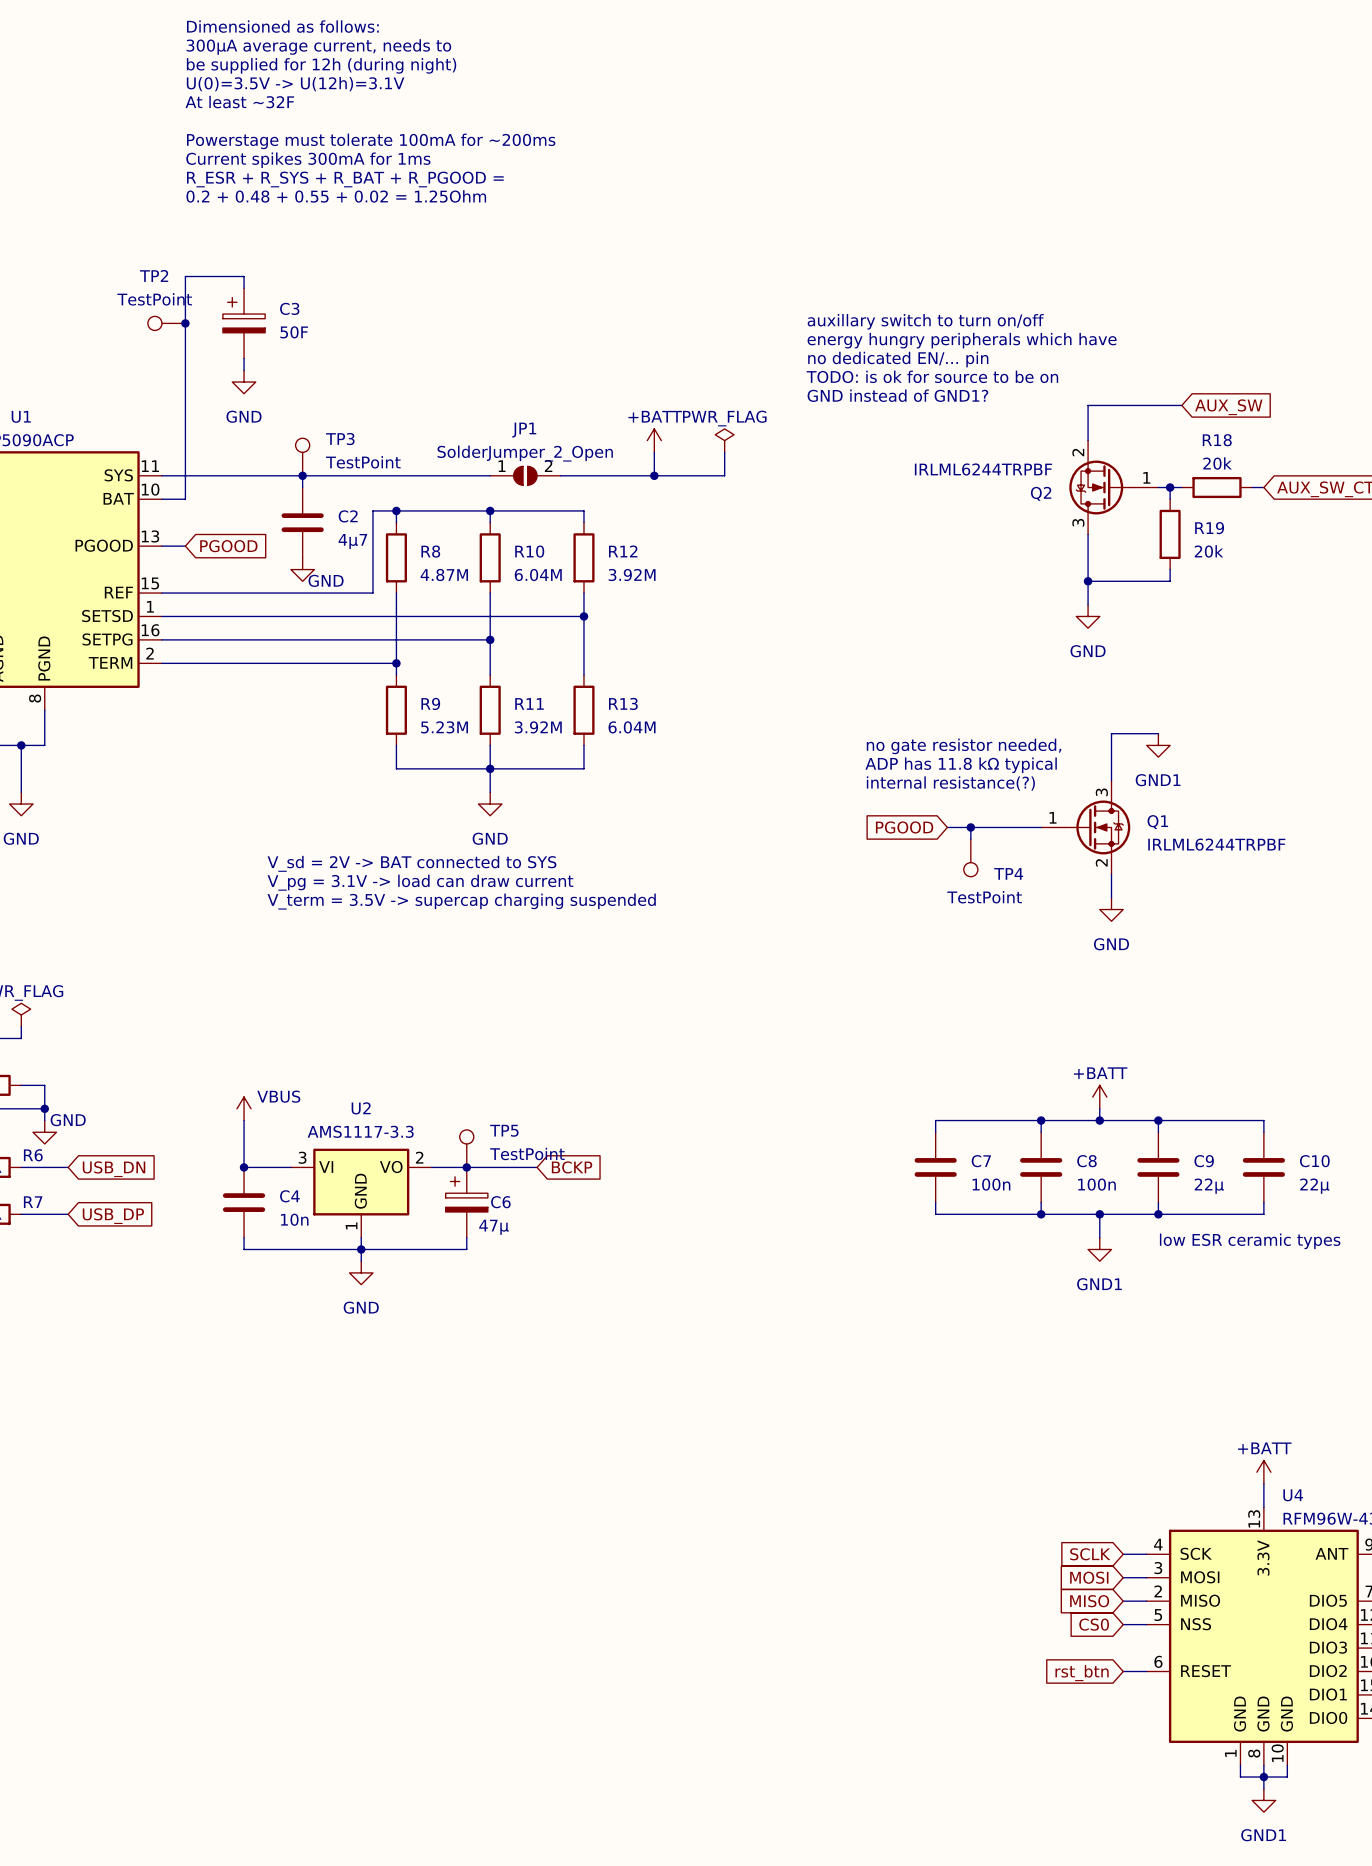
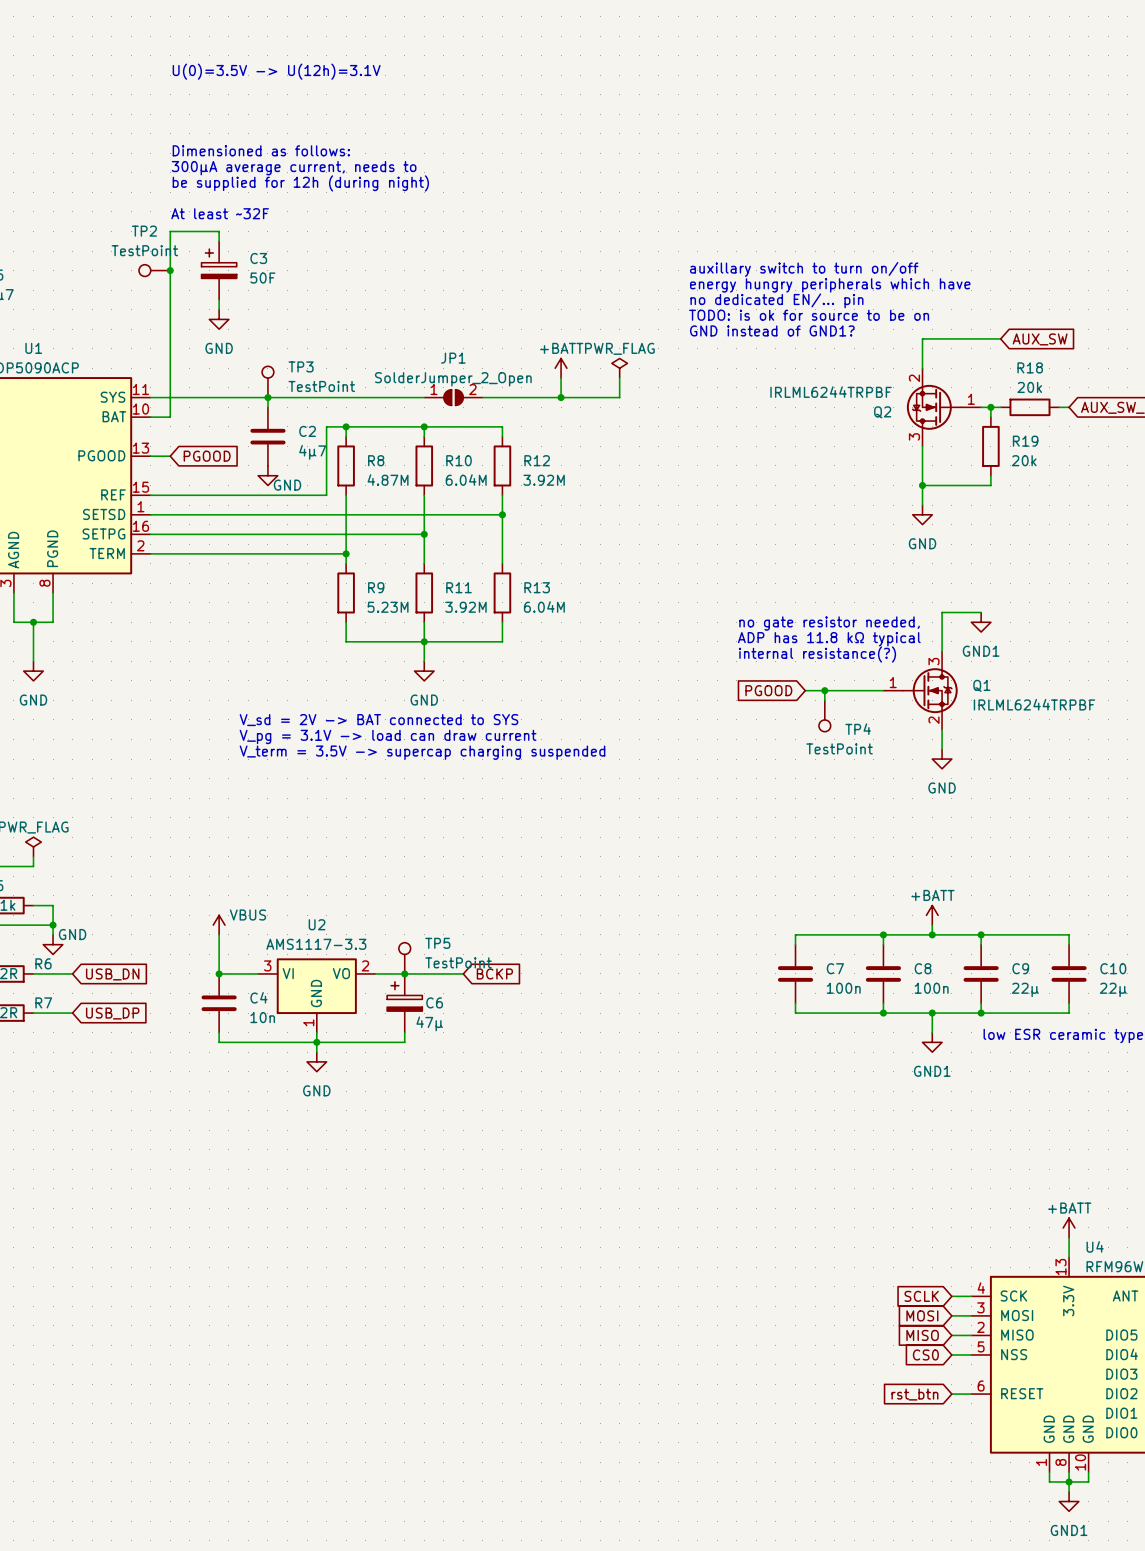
text position: Dimensioned as follows: (282, 26) -> Dimensioned as follows: (261, 150)
text position: 300µA average current, needs to (318, 47) -> 300µA average current, needs to (294, 168)
text position: be supplied for 12h (during night) (321, 65) -> be supplied for 12h (during night) (300, 183)
text position: At least ~32F (239, 102) -> At least ~32F (220, 213)
text: Powerstage must tolerate 100mA for ~200ms (371, 141) -> none
text: Current spikes 300mA for 1ms (308, 160) -> none
text: R_ESR + R_SYS + R_BAT + R_PGOOD = (345, 179) -> none
text: 0.2 + 0.48 + 0.55 + 0.02 = 1.25Ohm (336, 196) -> none

